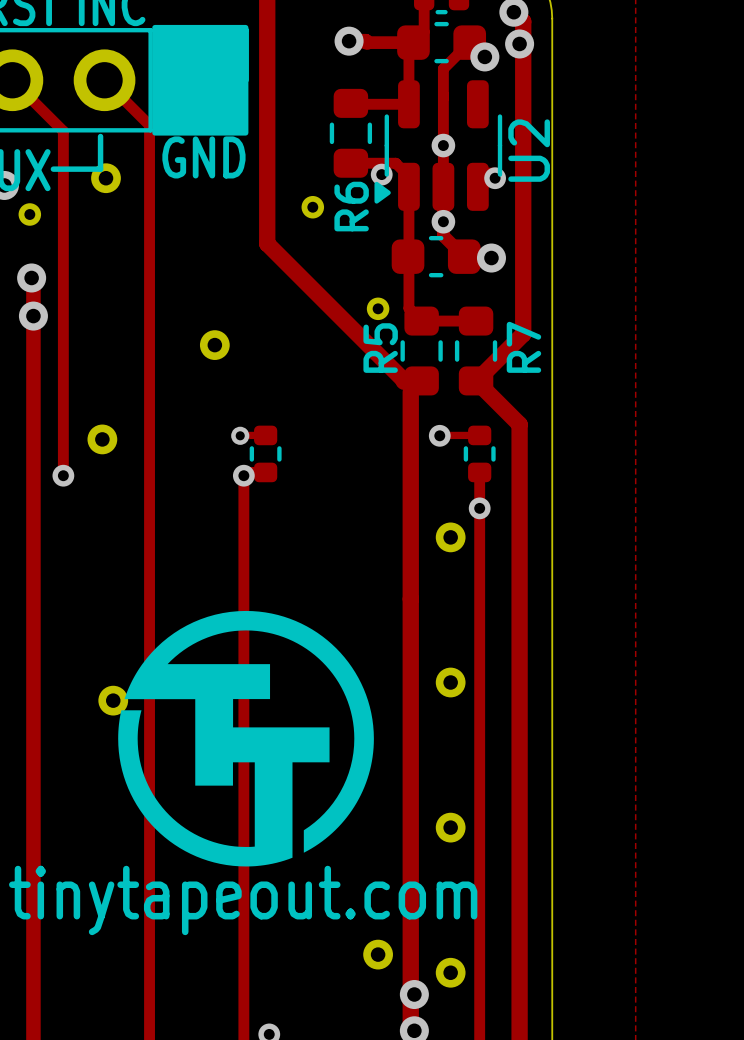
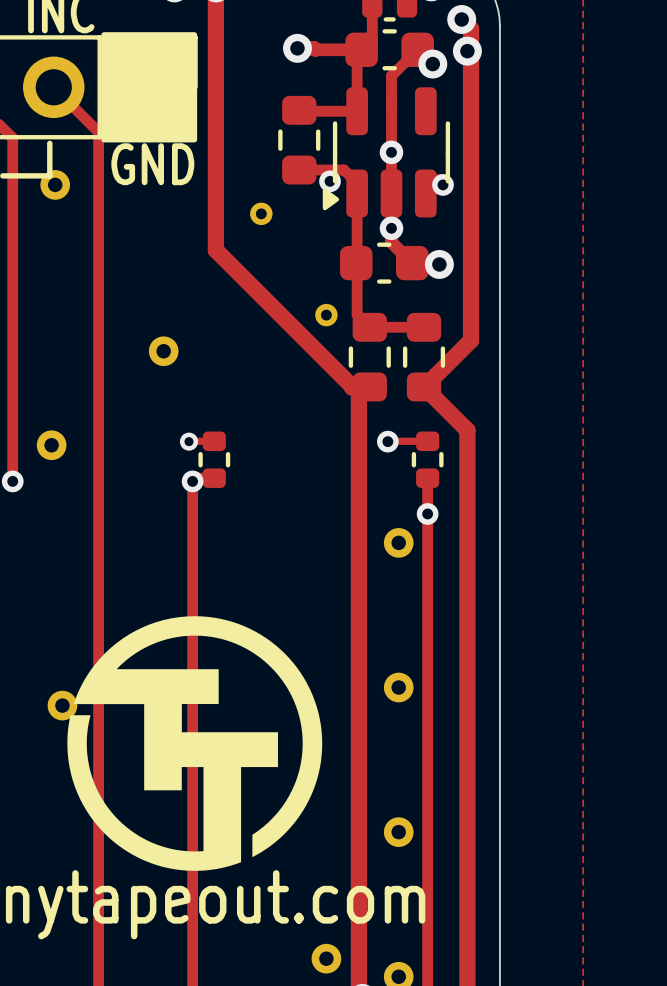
U2 name: U2 (529, 150) -> none
R6 name: R6 (351, 206) -> none
R7 name: R7 (523, 347) -> none
R5 name: R5 (380, 348) -> none

